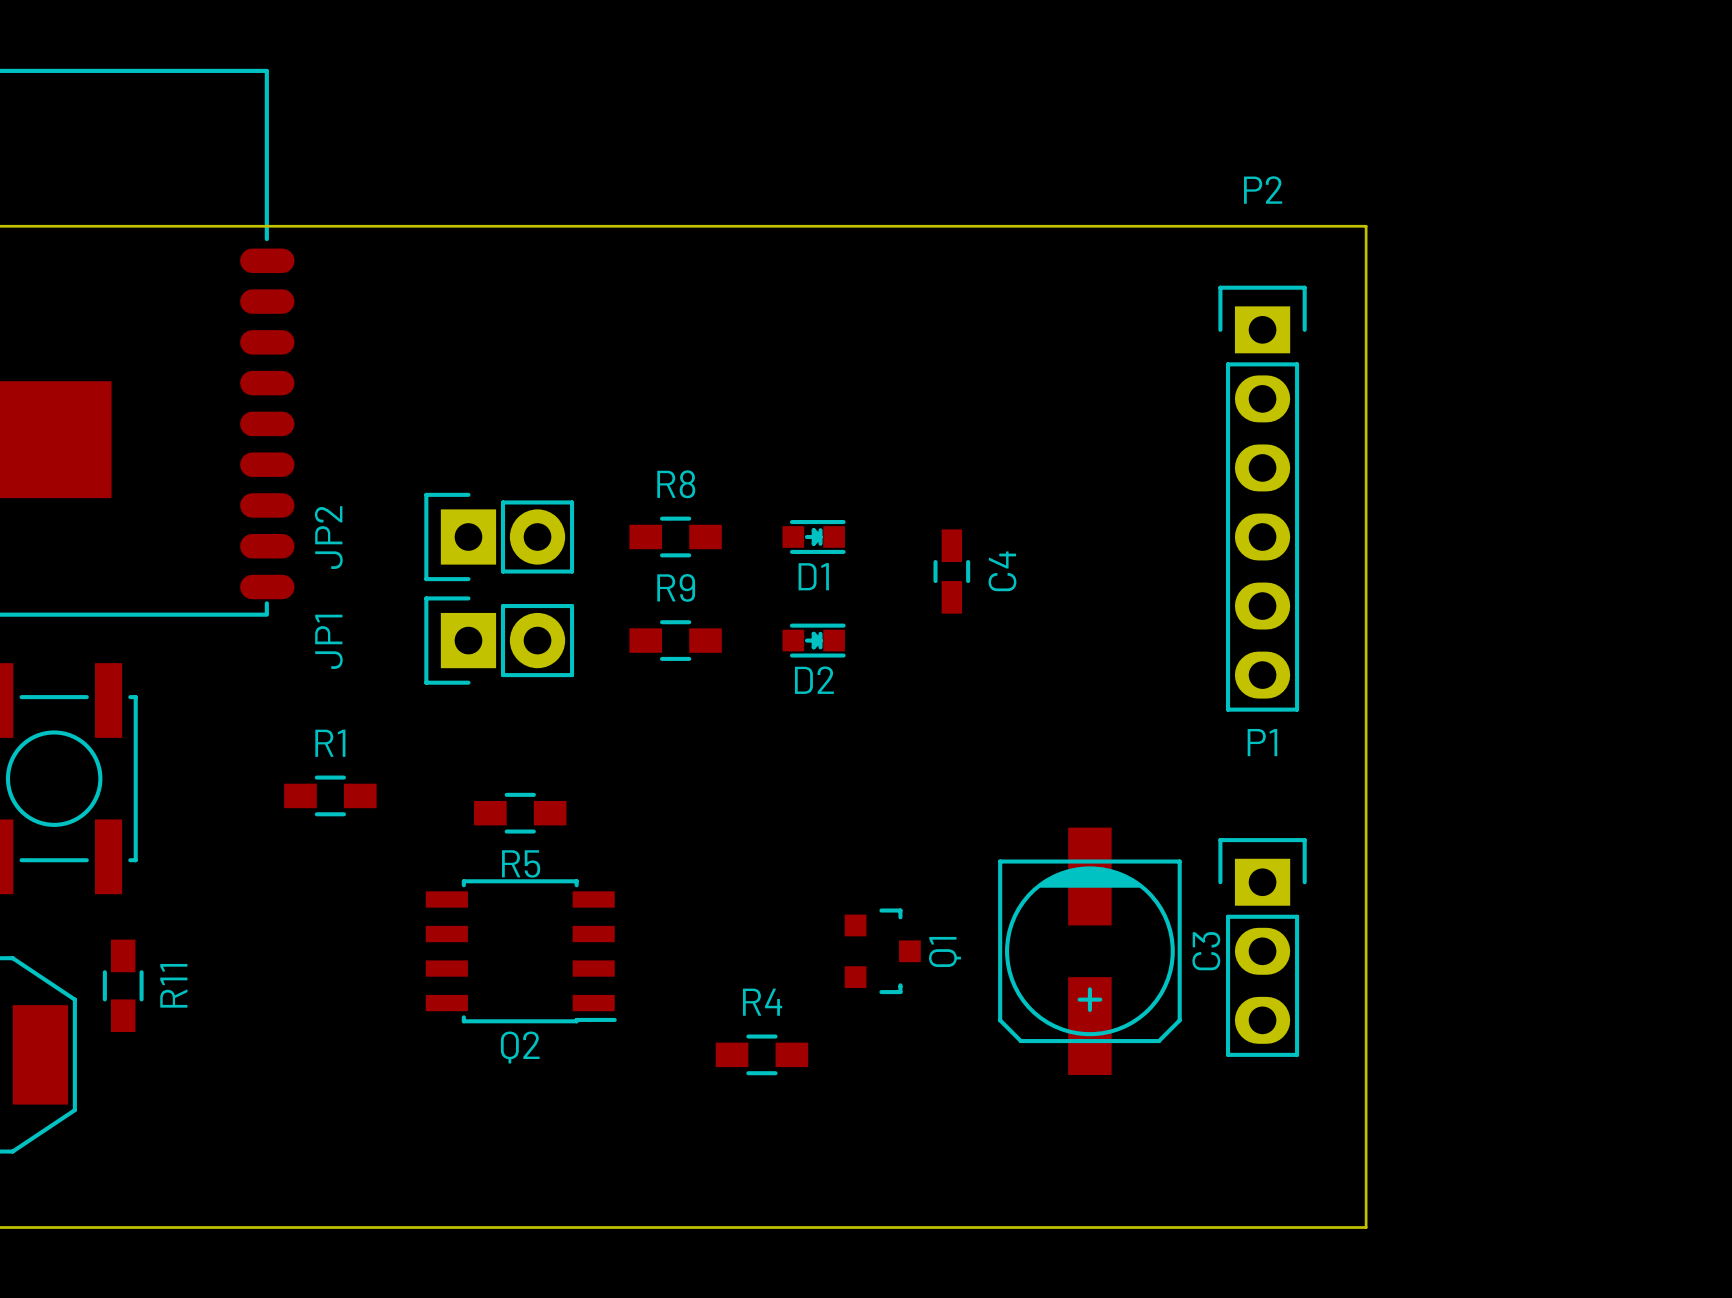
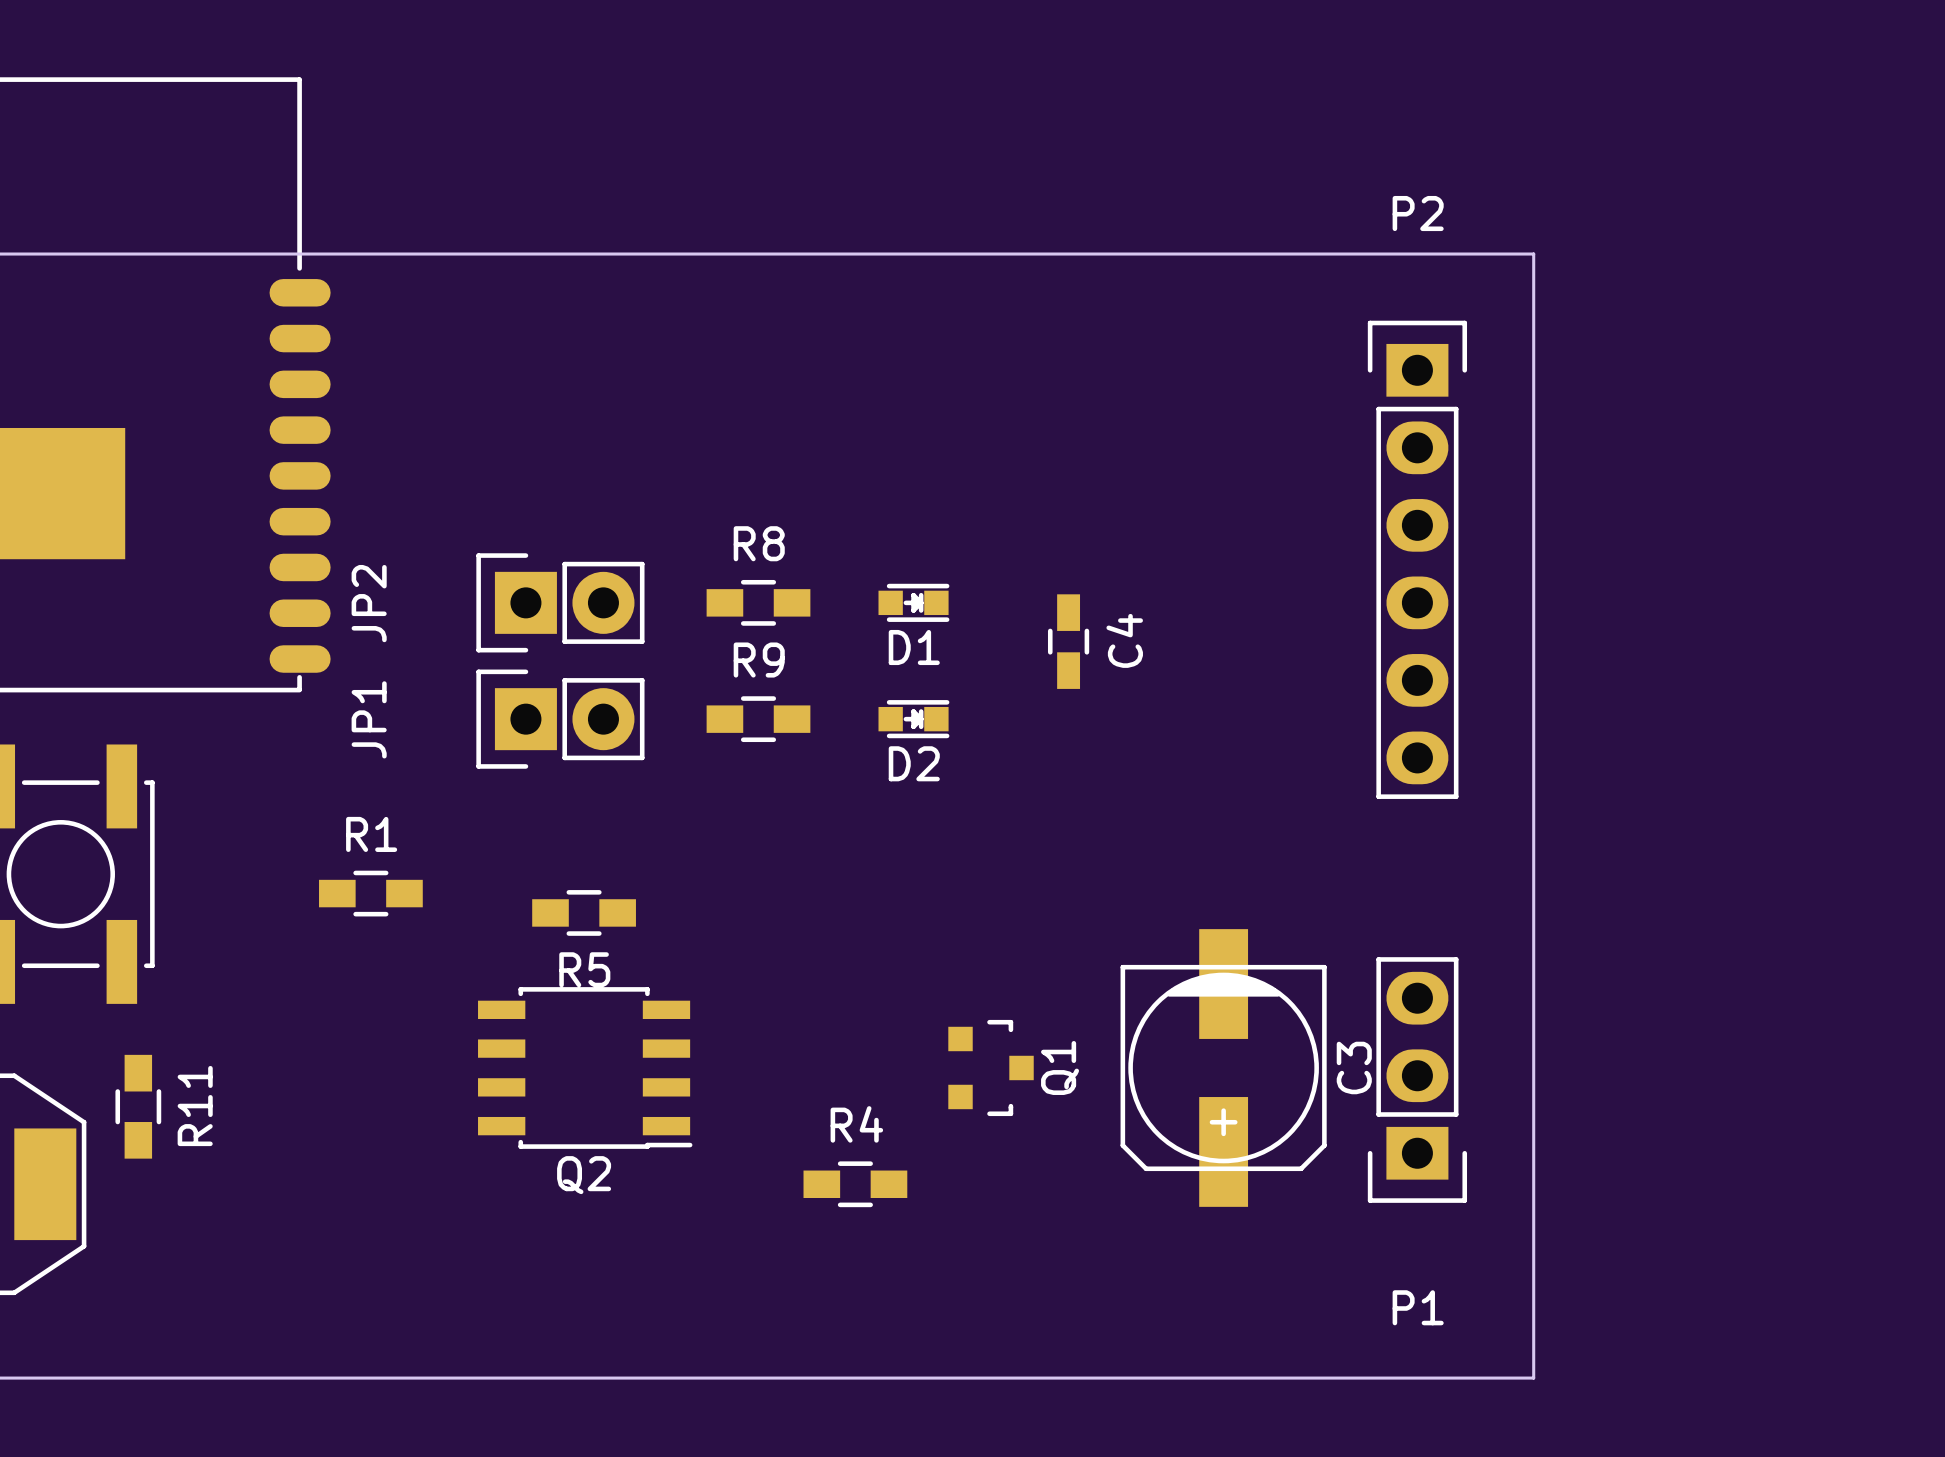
P1 rotation: 0° (1262, 947) -> 180° (1417, 1080)

